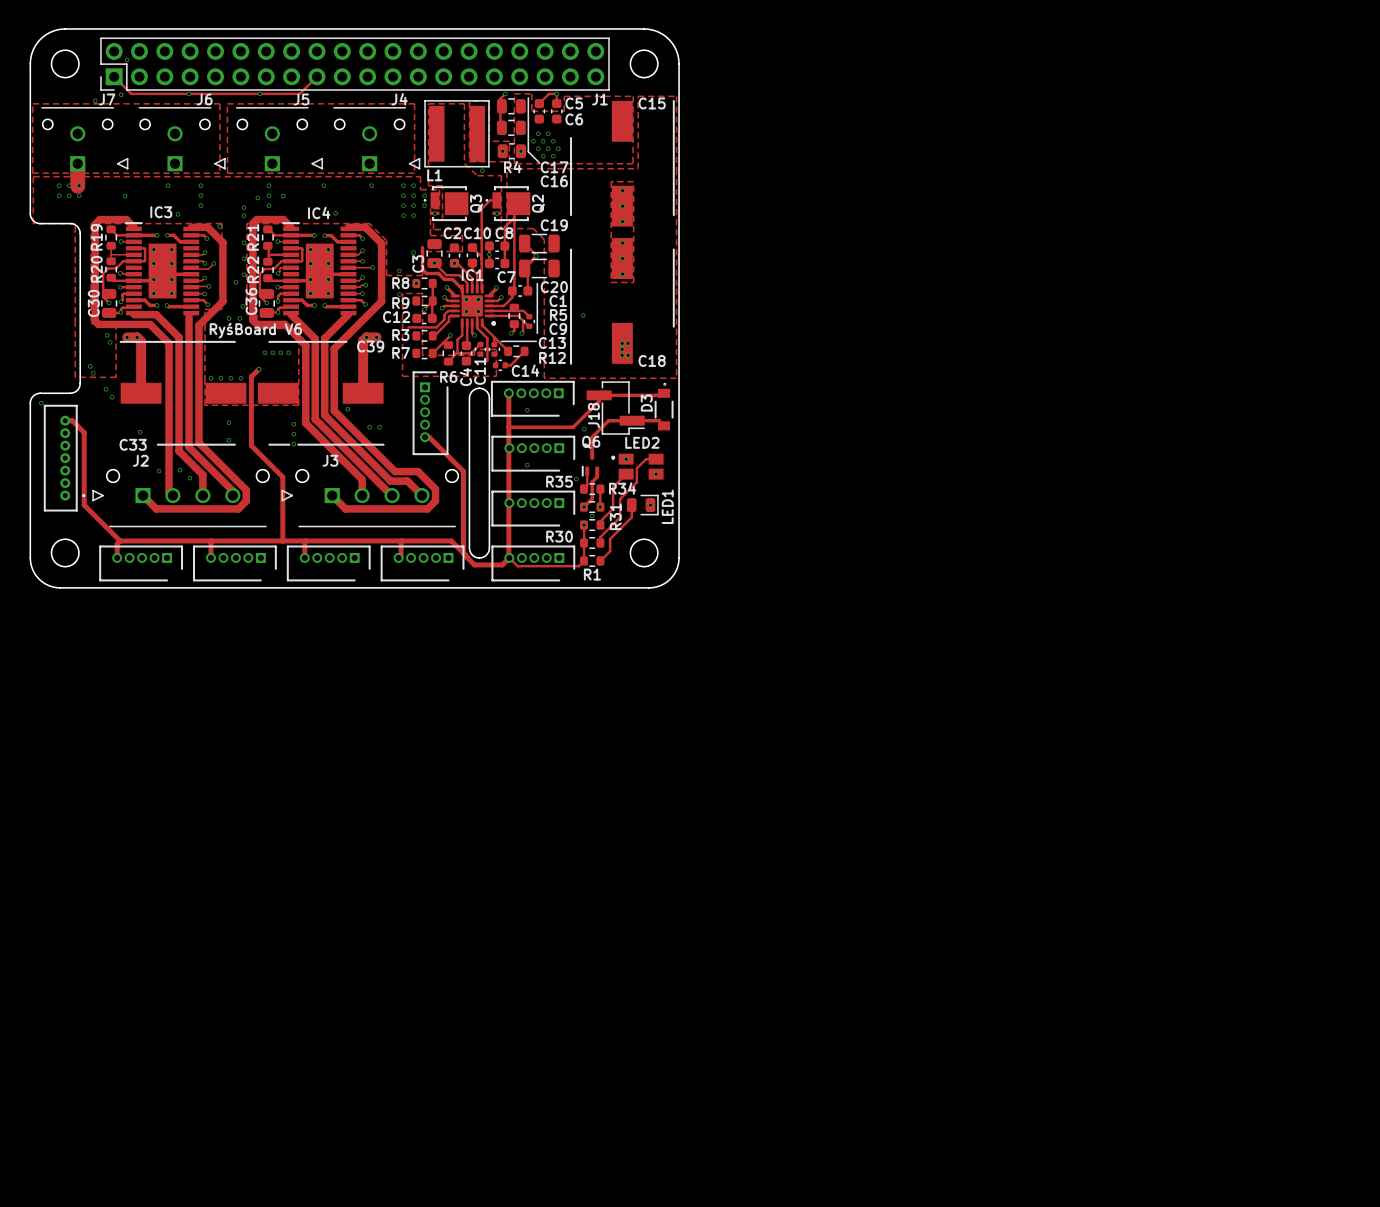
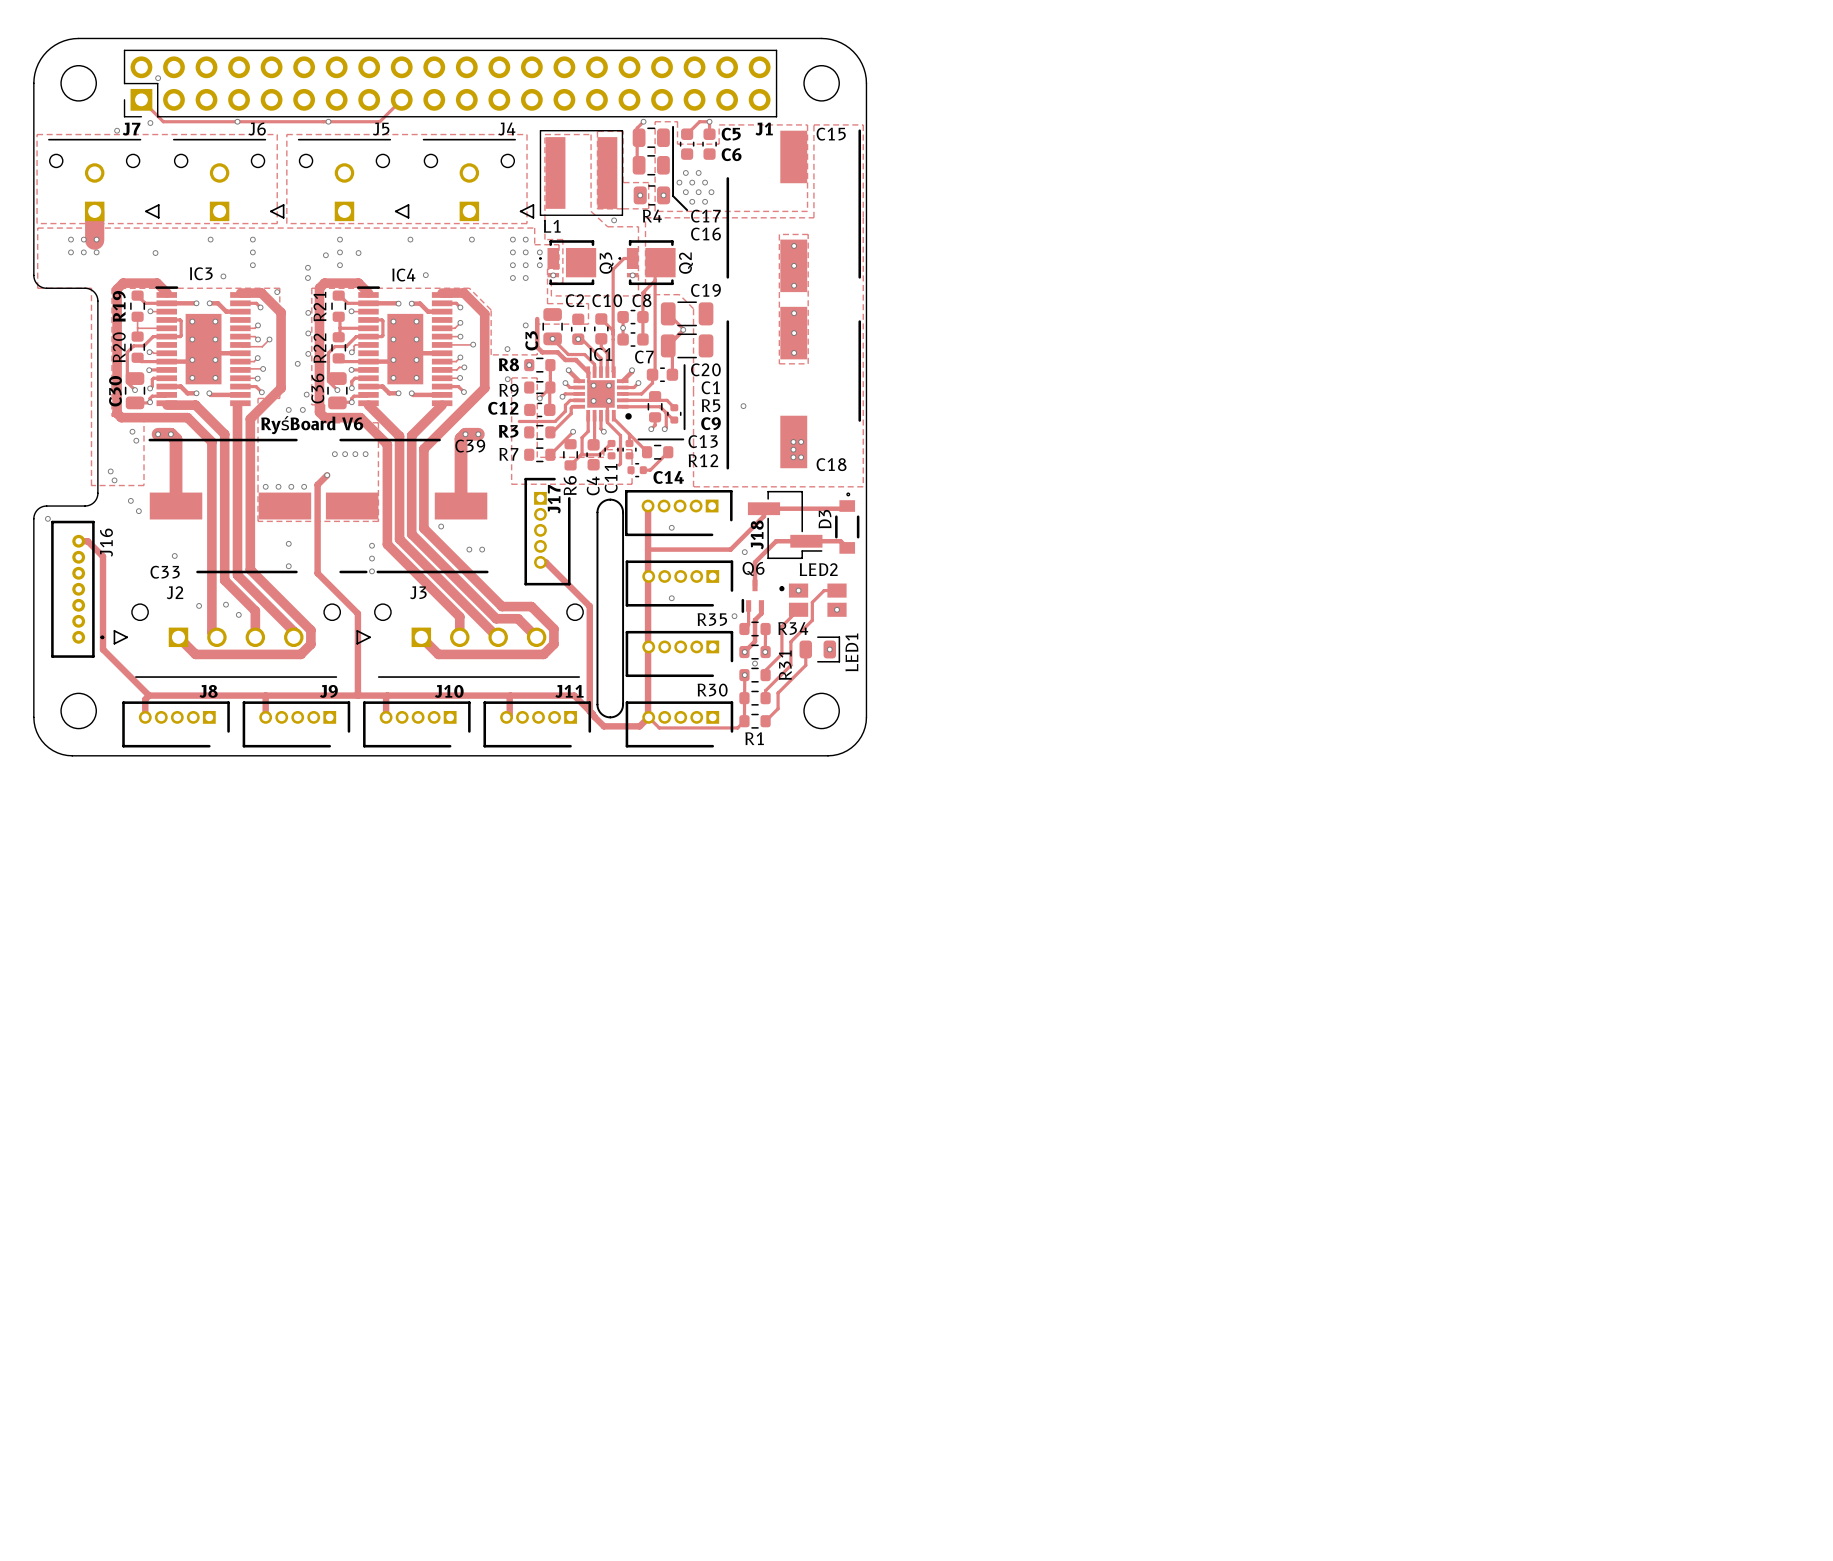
R6 name rotation: 0° (448, 376) -> 90° counterclockwise (570, 485)
J17 name: none -> J17 (554, 499)
J16 name: none -> J16 (106, 542)
J8 name: none -> J8 (208, 691)
J9 name: none -> J9 (328, 691)
J10 name: none -> J10 (449, 691)
J11 name: none -> J11 (569, 691)

